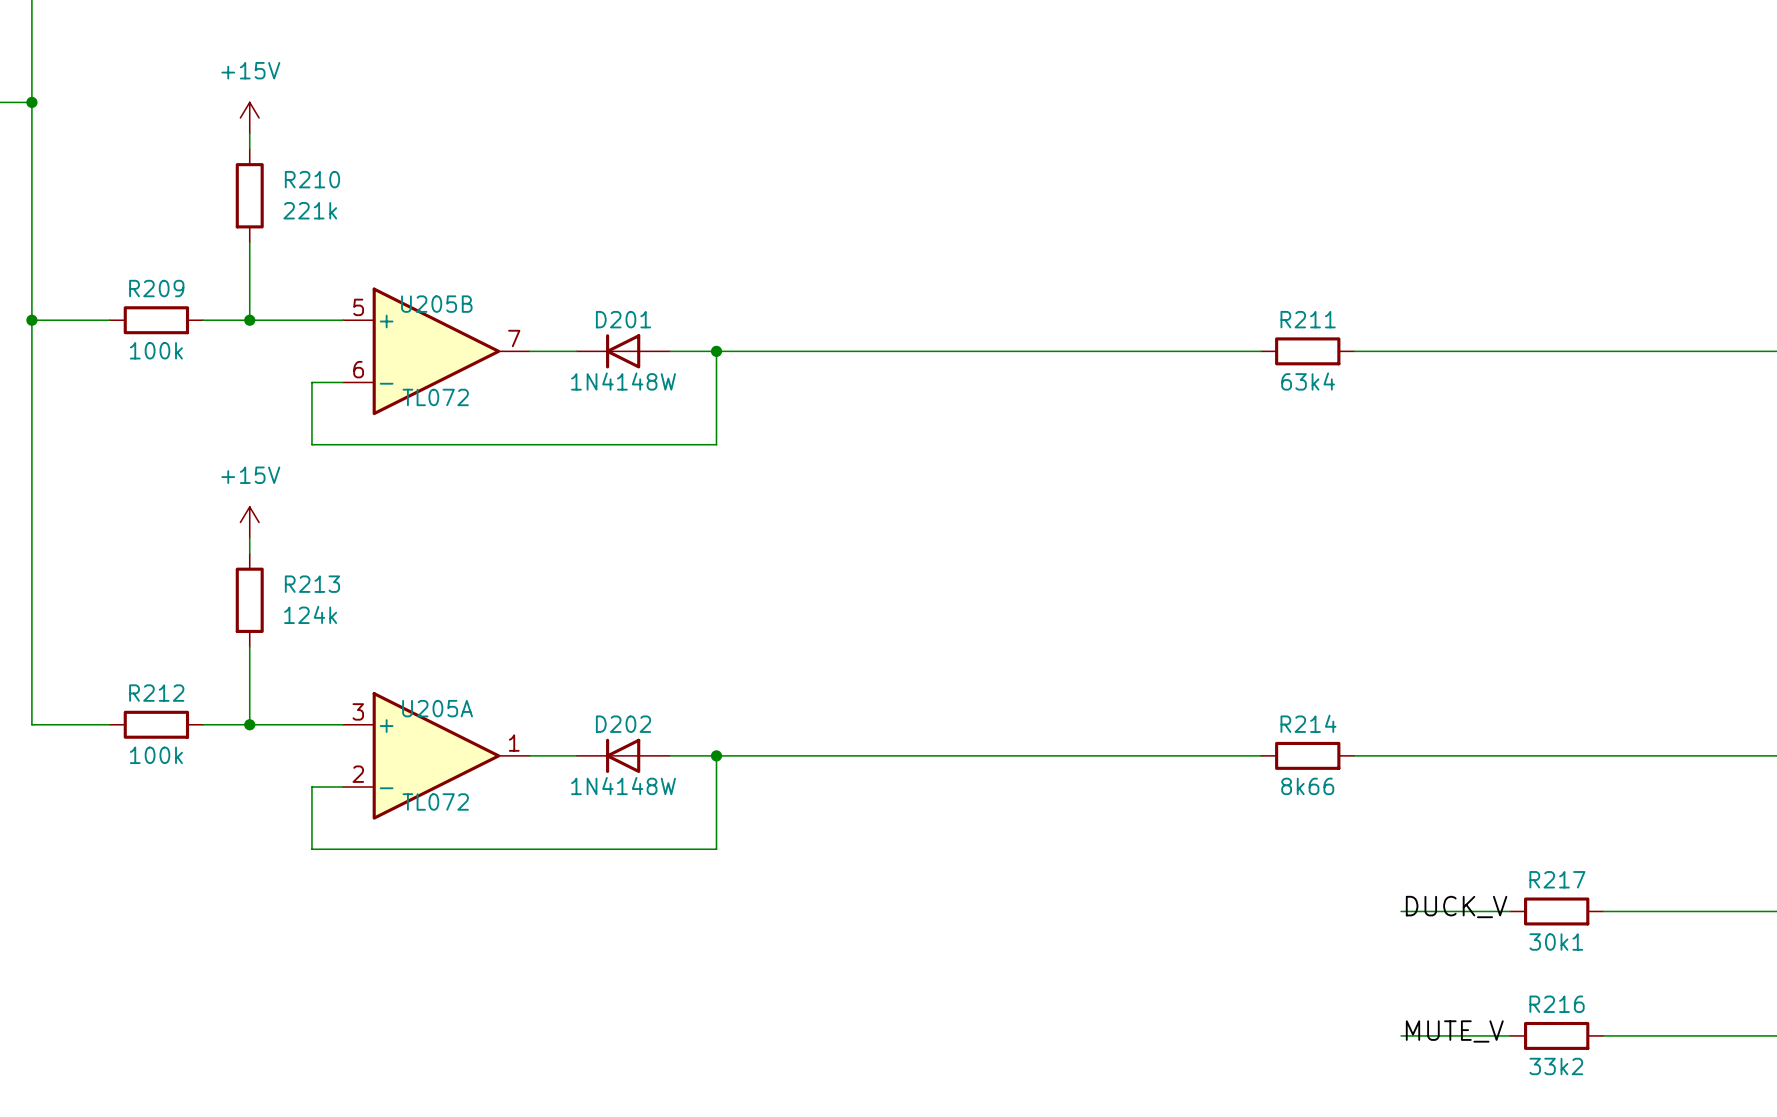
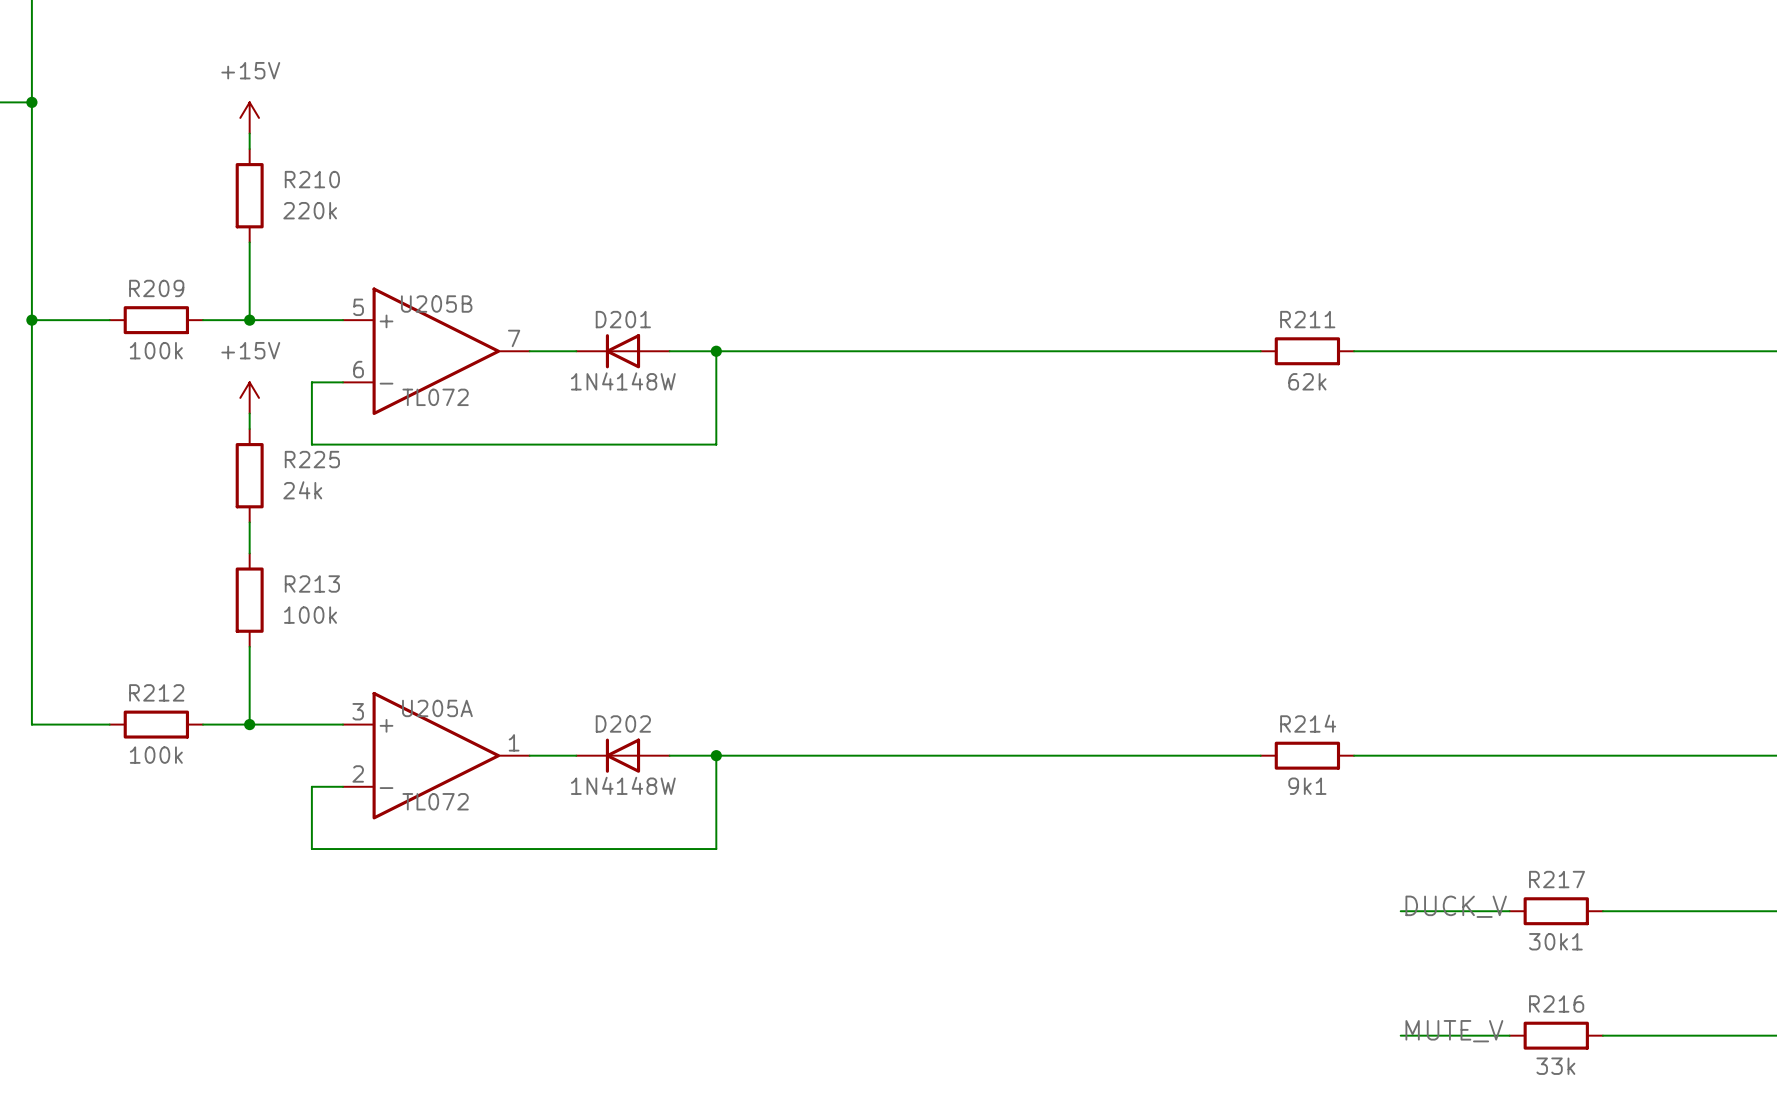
R210 value: 221k (310, 210) -> 220k (310, 210)
R211 value: 63k4 (1308, 381) -> 62k (1307, 381)
wire: none -> (249, 413) (249, 429)
R225: none -> 24k (249, 475)
power symbol position: +15V (249, 522) -> +15V (249, 397)
R213 value: 124k (310, 614) -> 100k (310, 615)
R214 value: 8k66 (1307, 786) -> 9k1 (1307, 786)
R216 value: 33k2 (1556, 1066) -> 33k (1555, 1066)

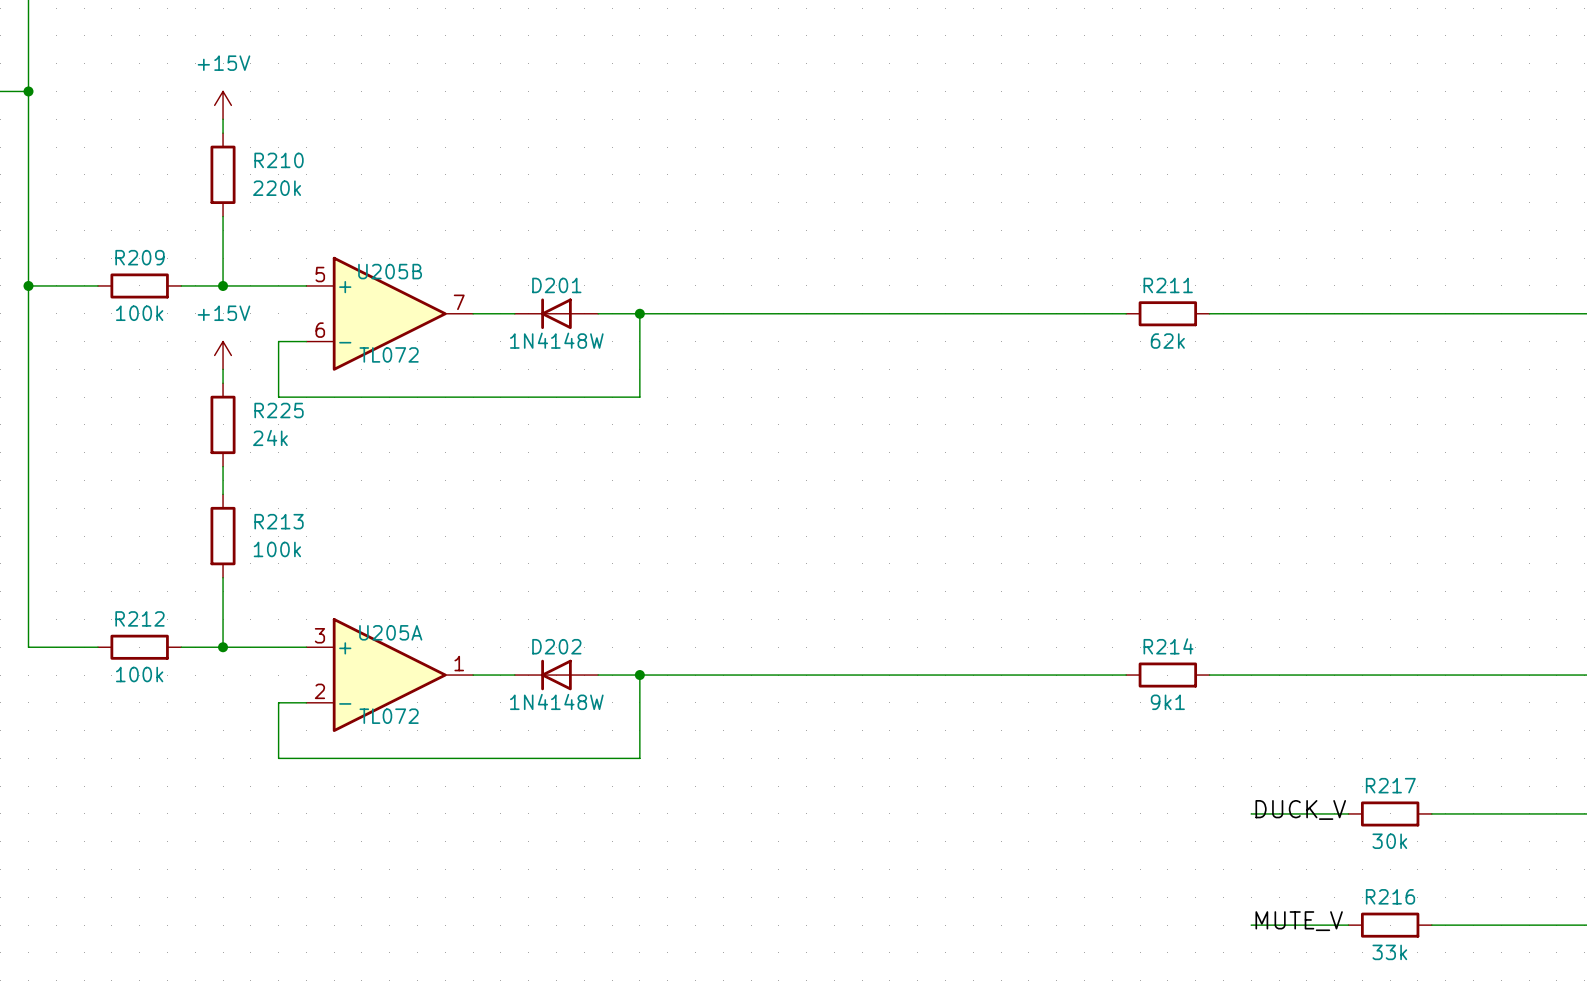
R217 value: 30k1 (1555, 941) -> 30k (1389, 841)

